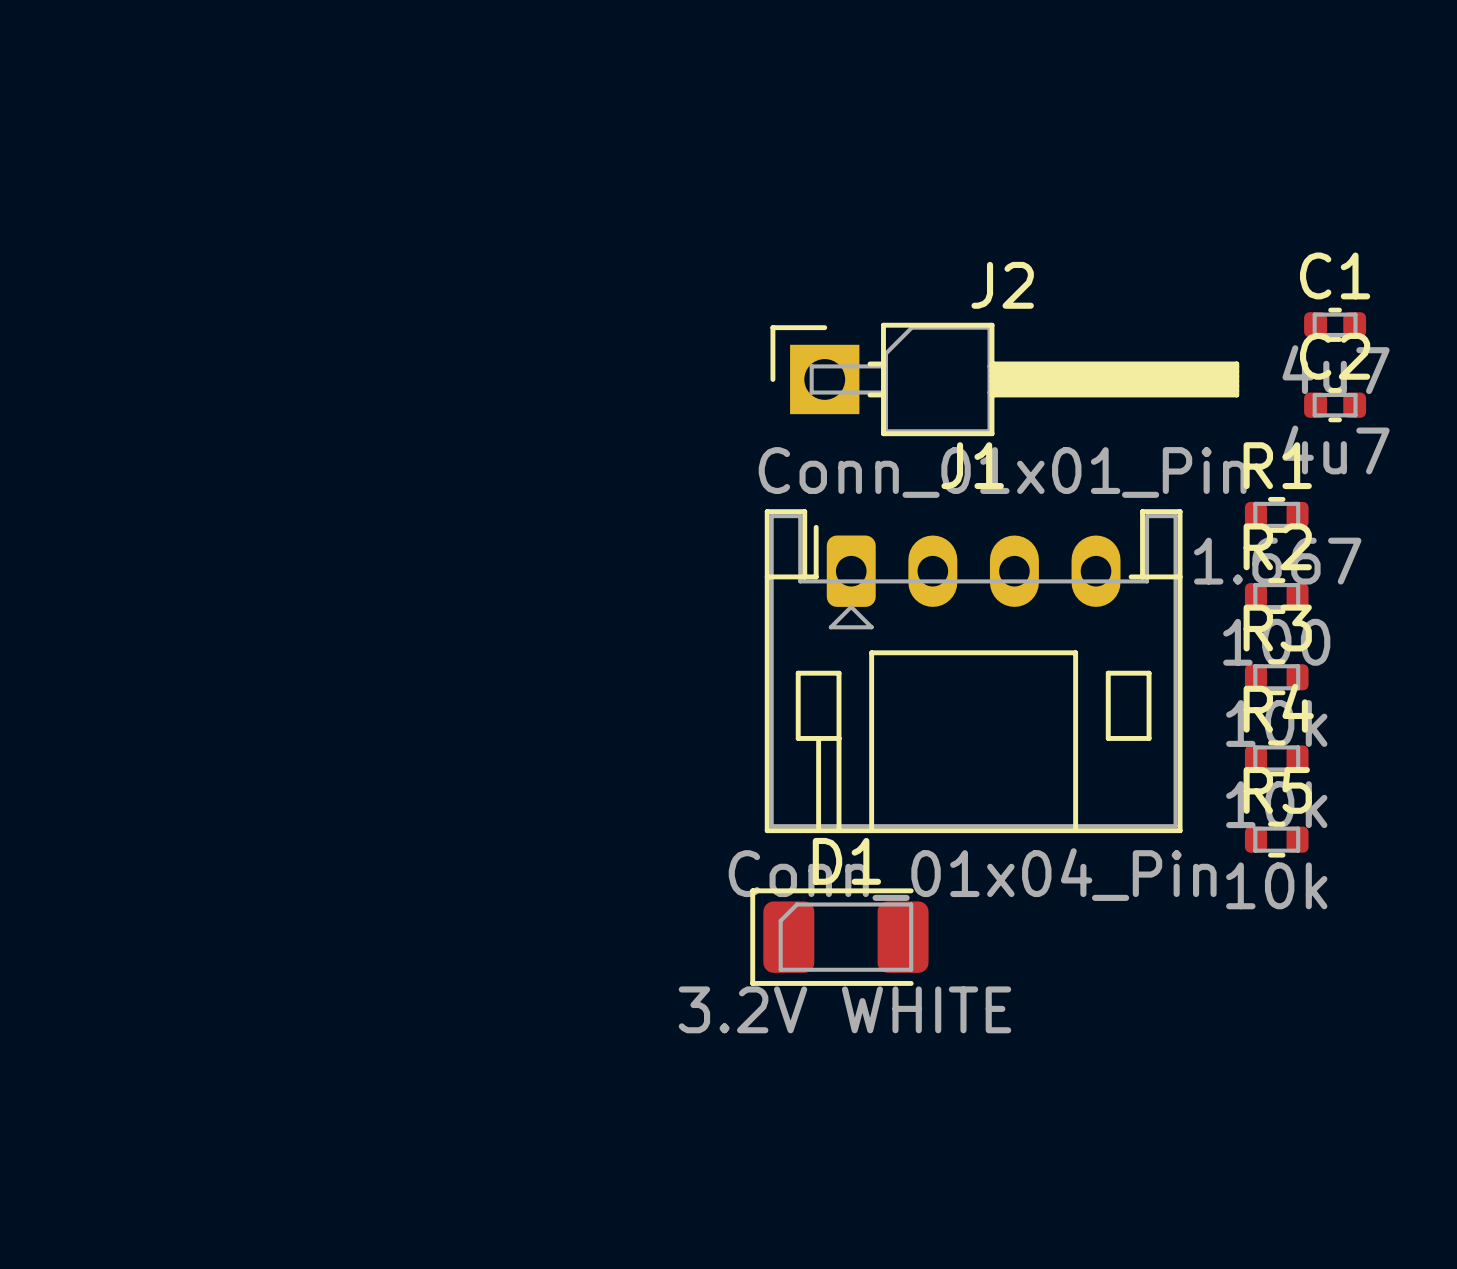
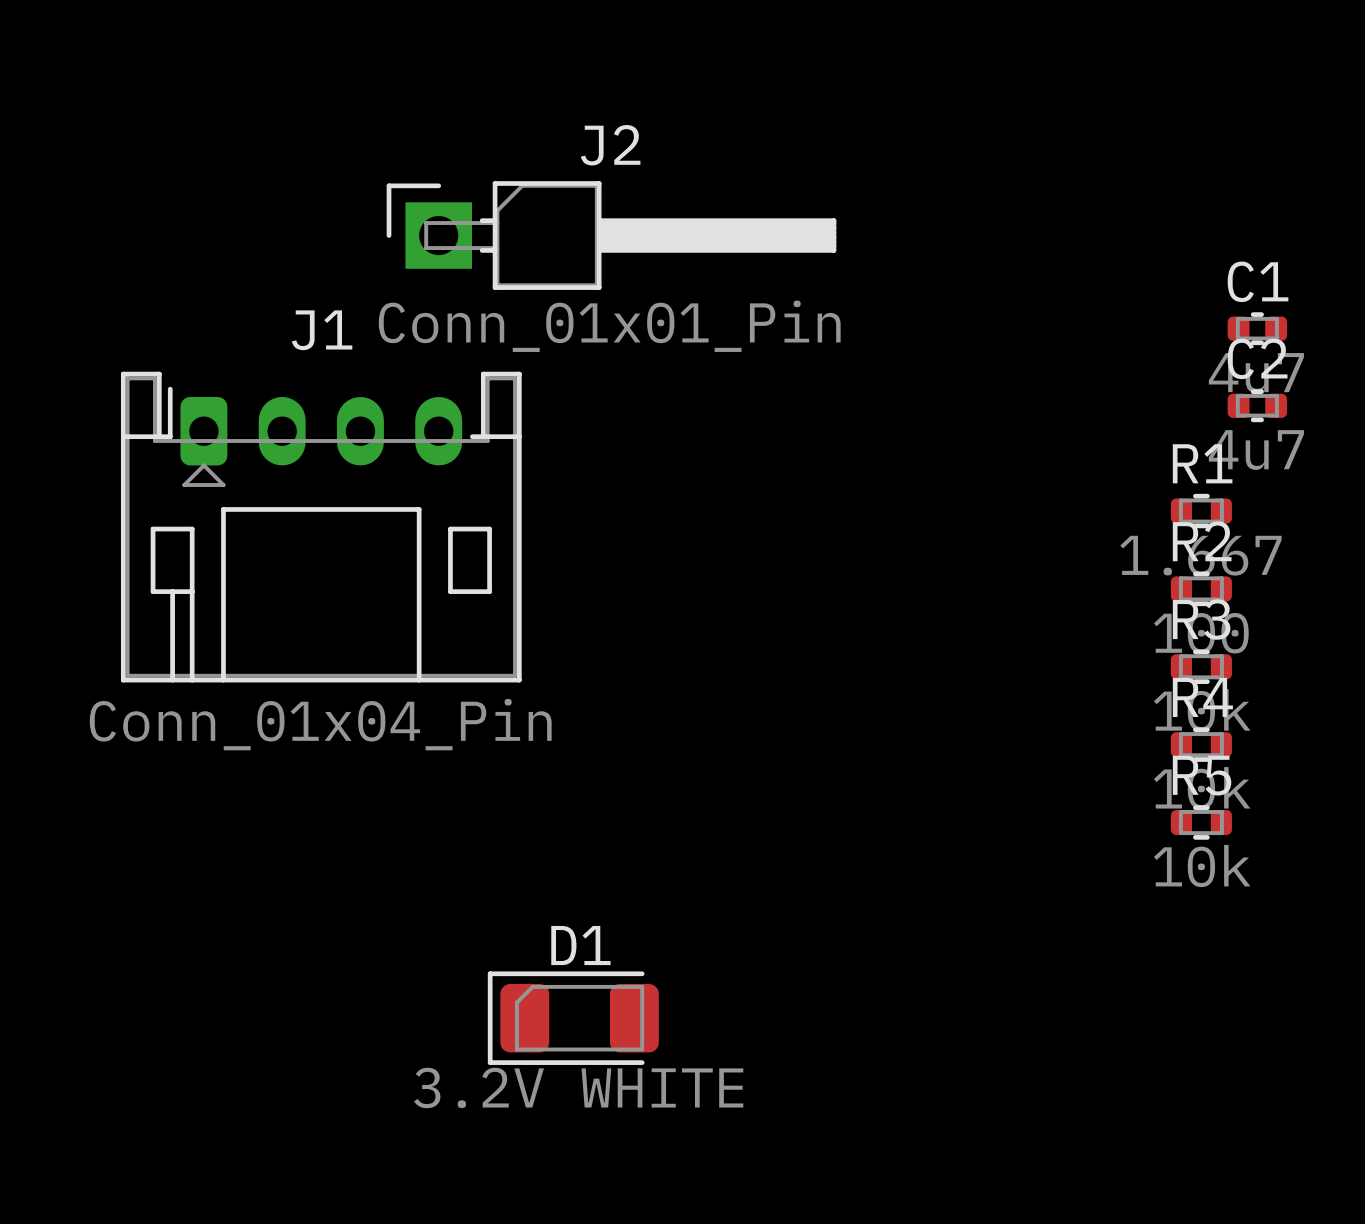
J2 position: (1004, 379) -> (611, 235)
J1 position: (973, 671) -> (321, 527)
D1 position: (839, 937) -> (573, 1018)

